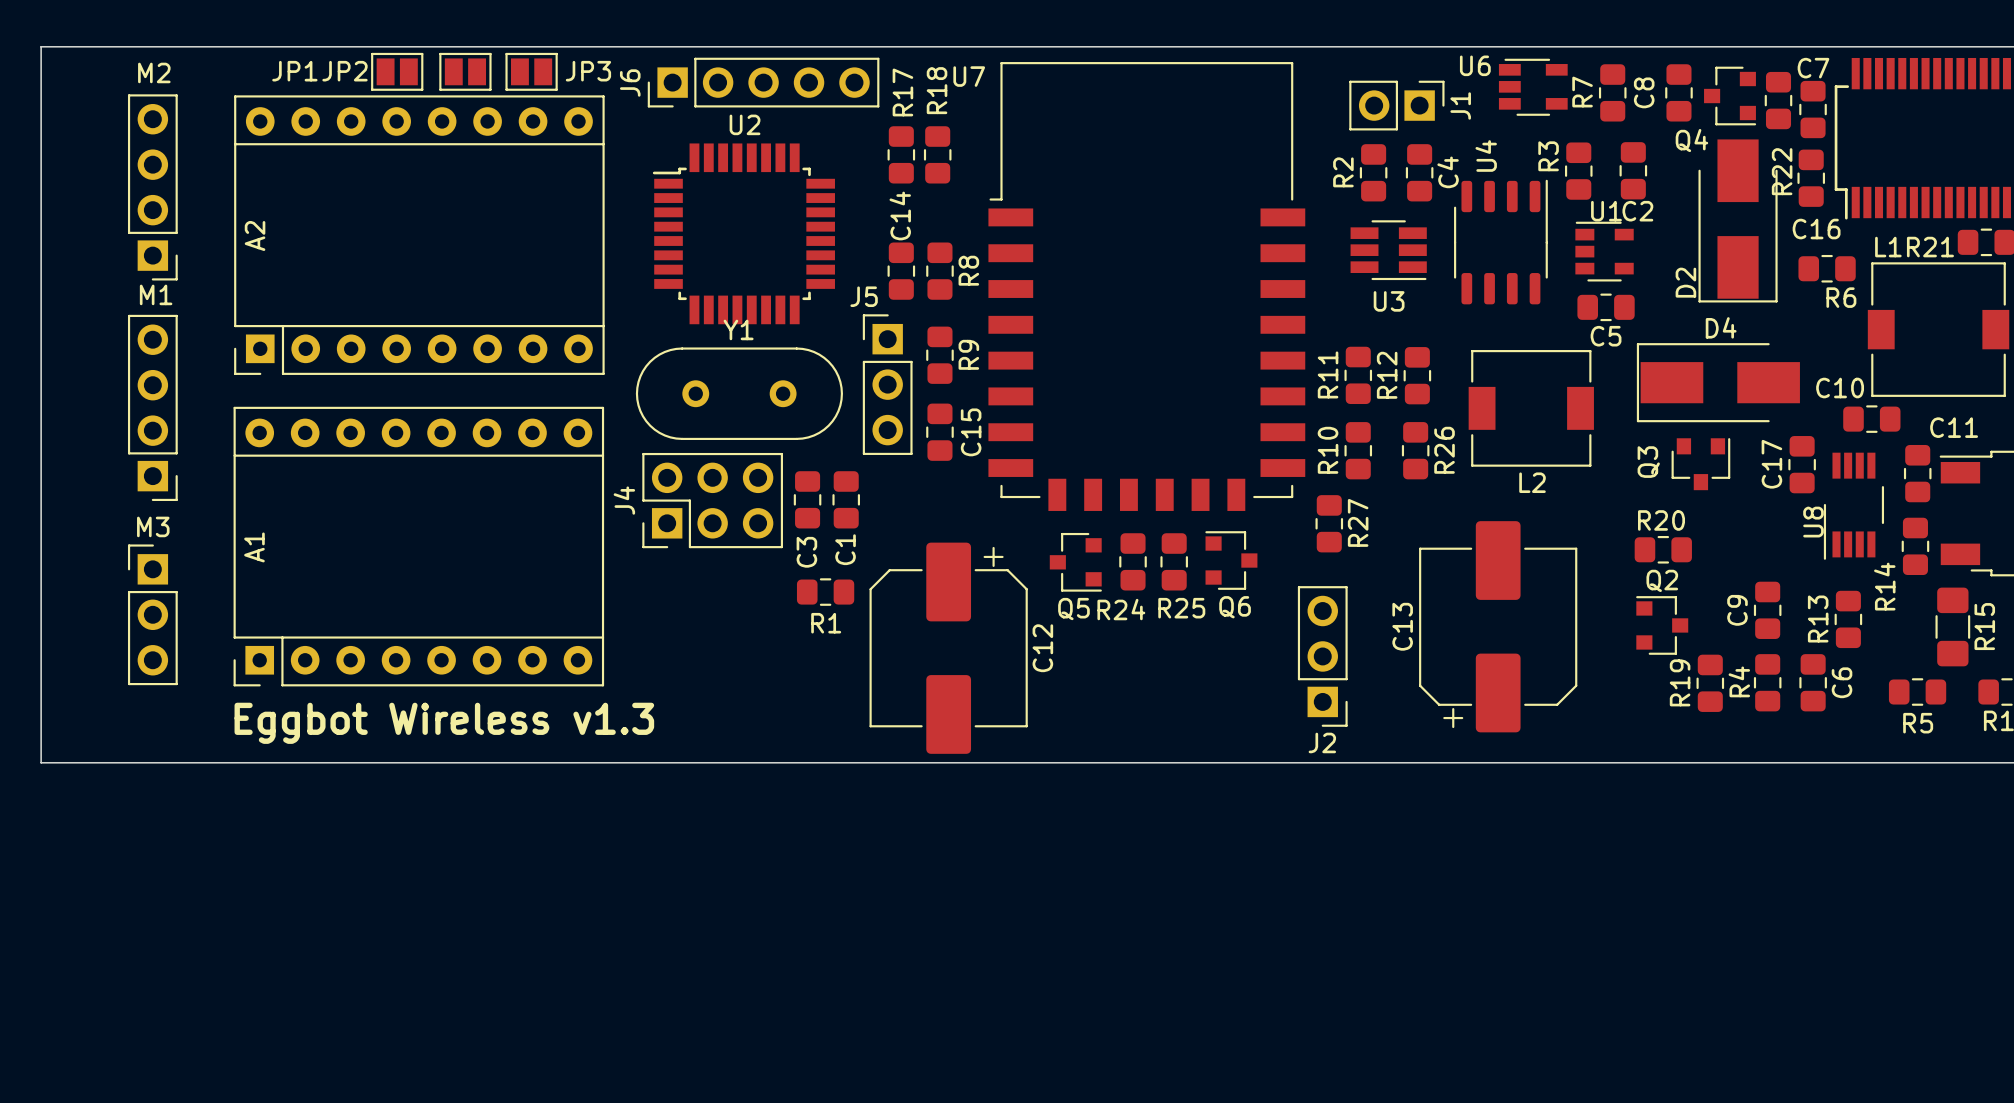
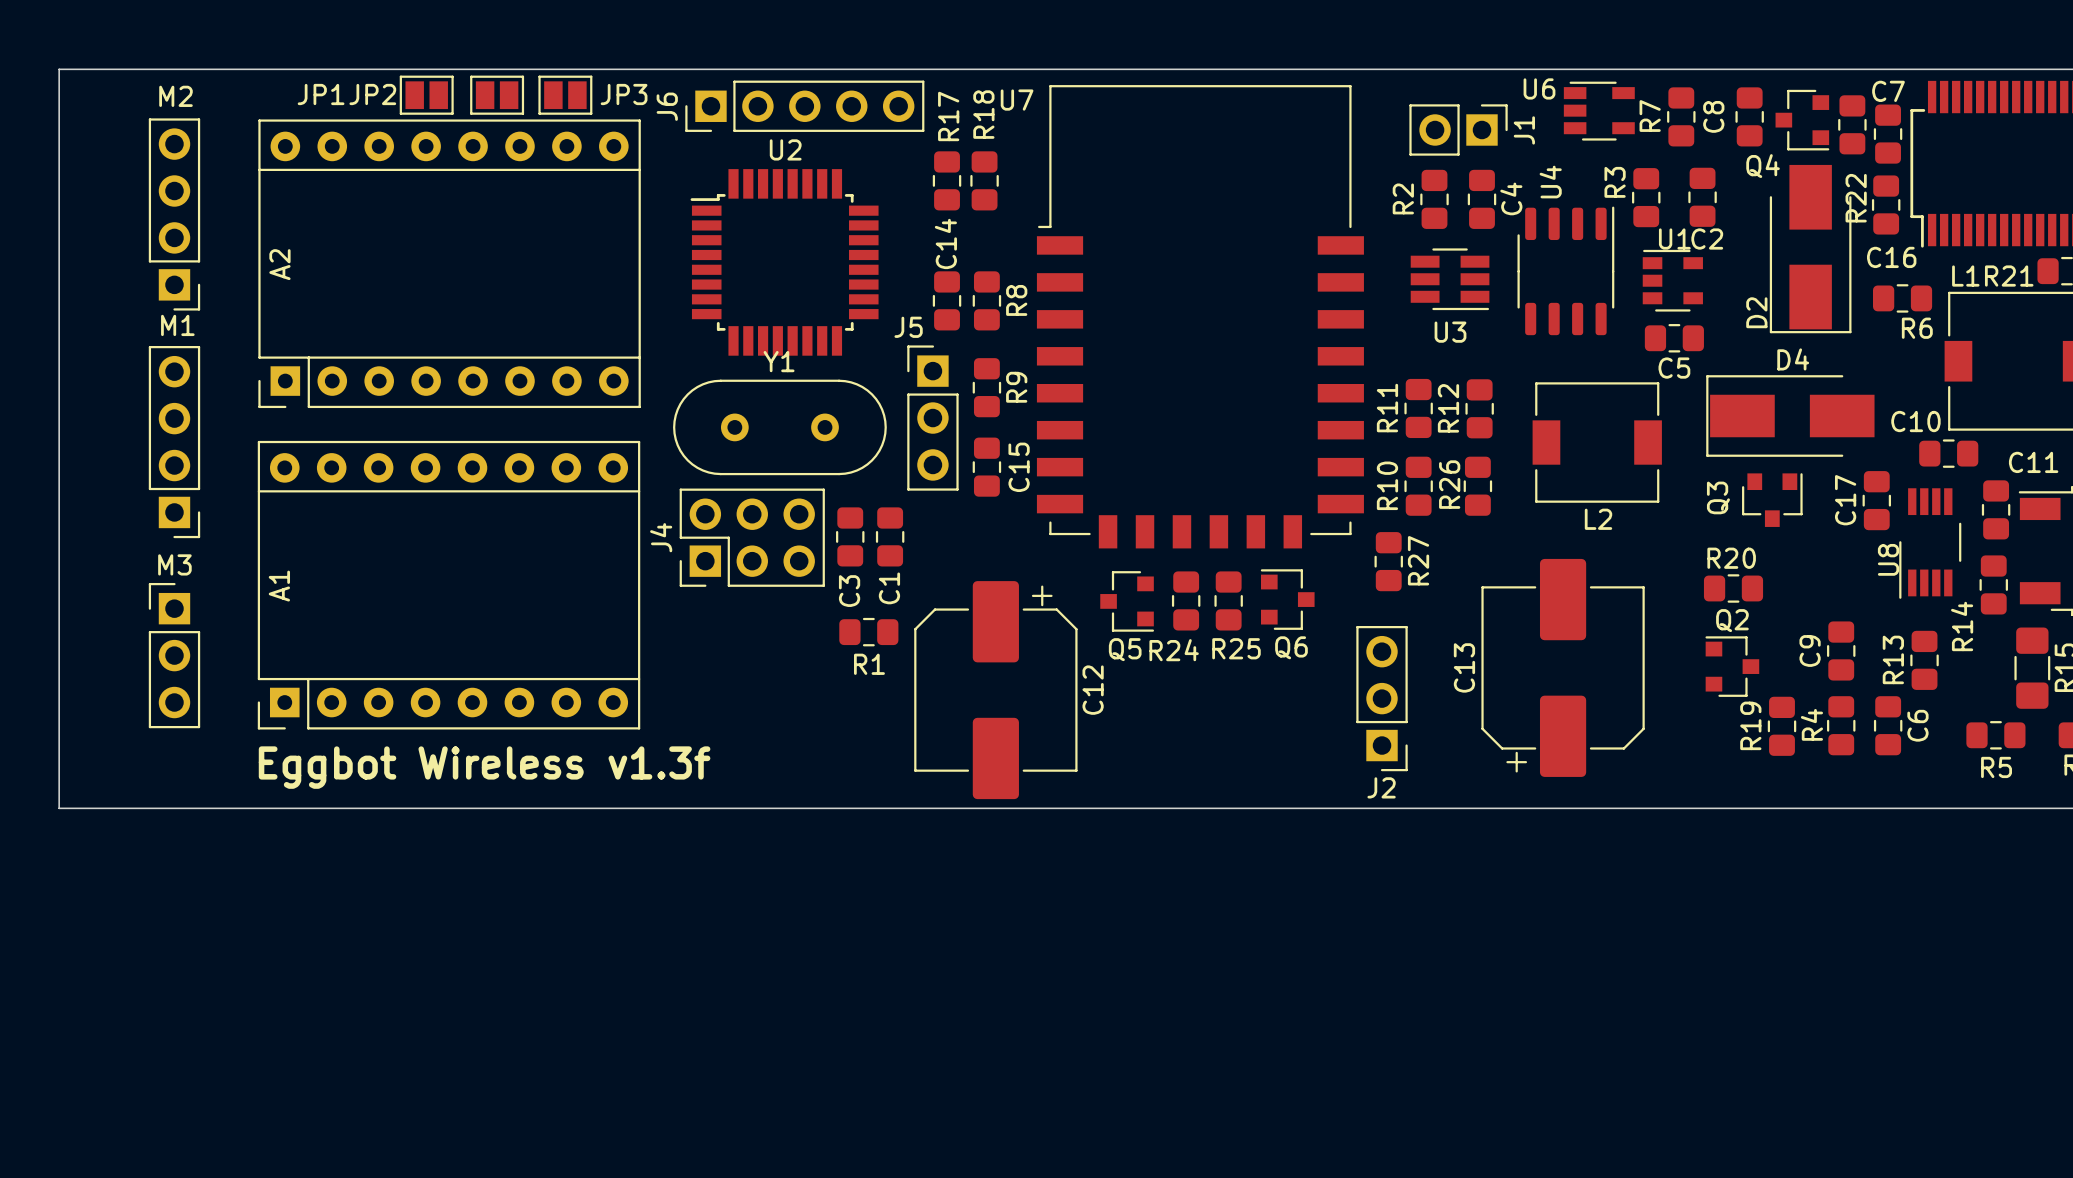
R26 name position: R26 (1444, 450) -> R26 (1449, 484)
text: Eggbot Wireless v1.3 (444, 723) -> Eggbot Wireless v1.3f (484, 767)

